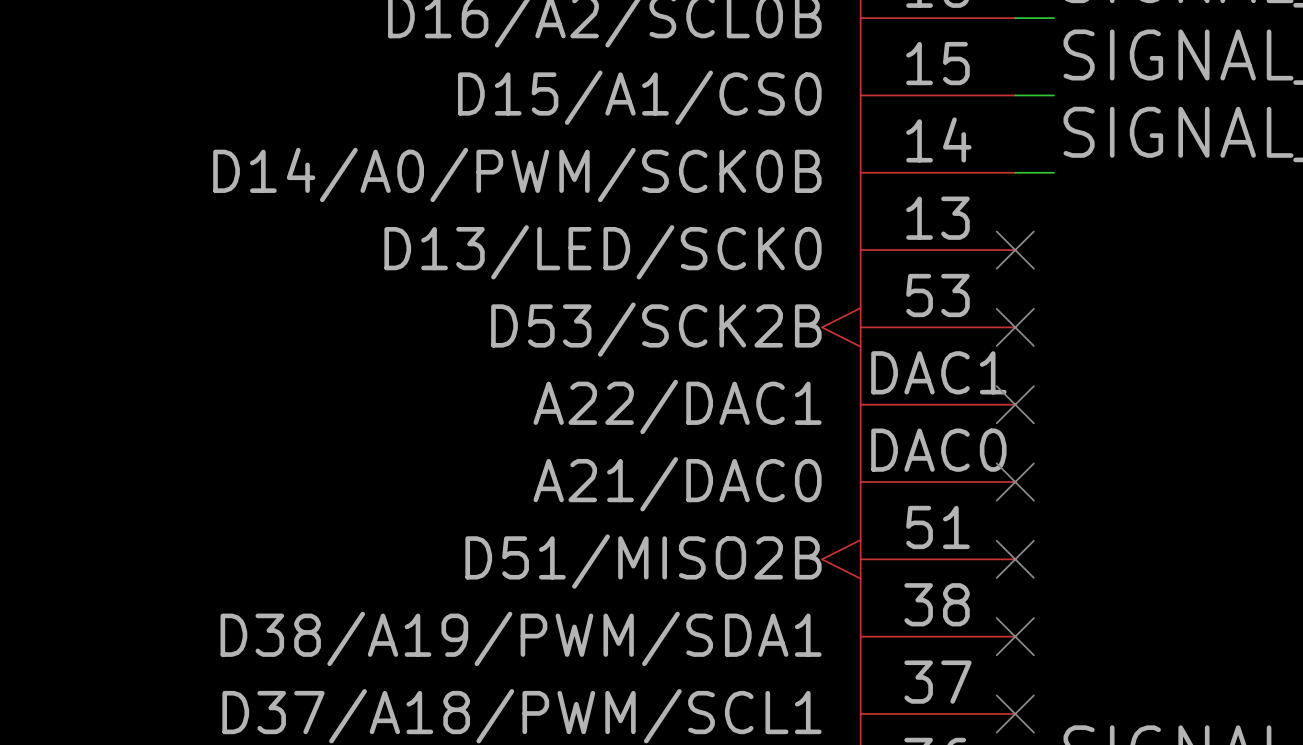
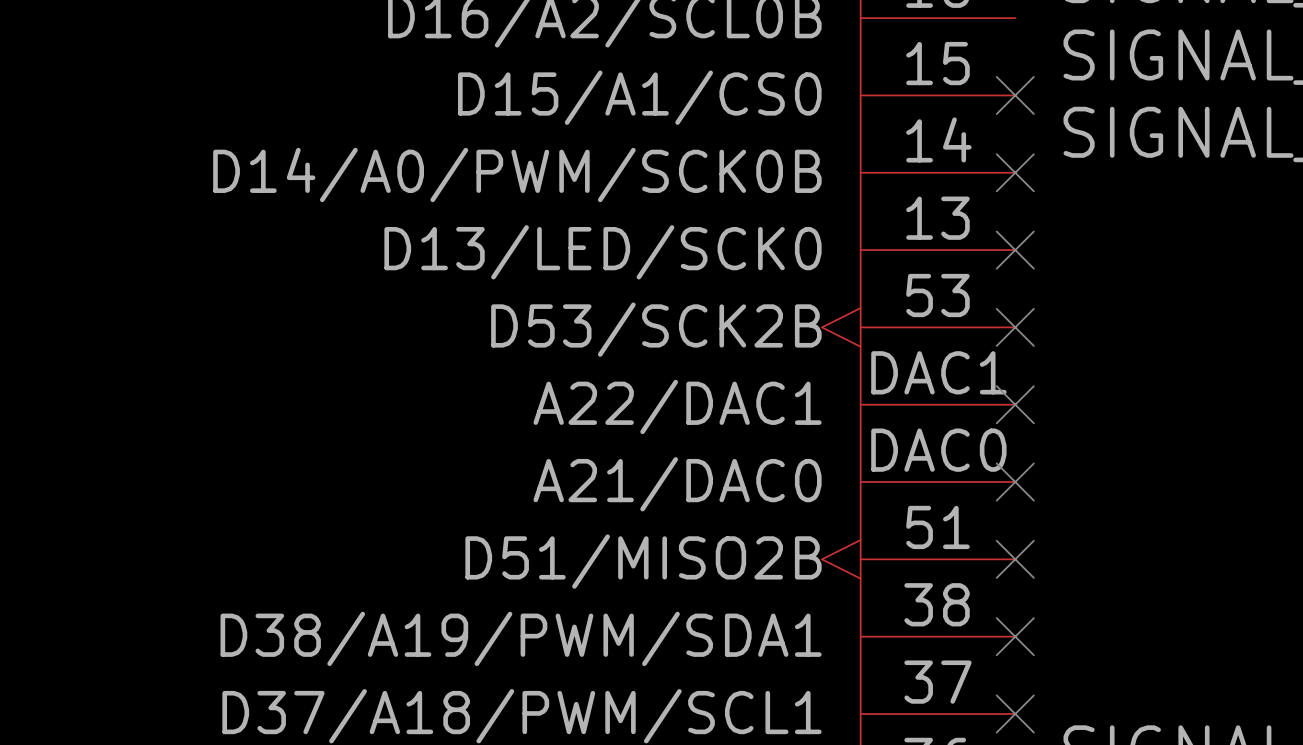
wire: (1015, 18) (1053, 18) -> none
wire: (1015, 95) (1053, 95) -> none
no-connect mark: none -> (1015, 95)
wire: (1015, 172) (1053, 172) -> none
no-connect mark: none -> (1015, 172)

